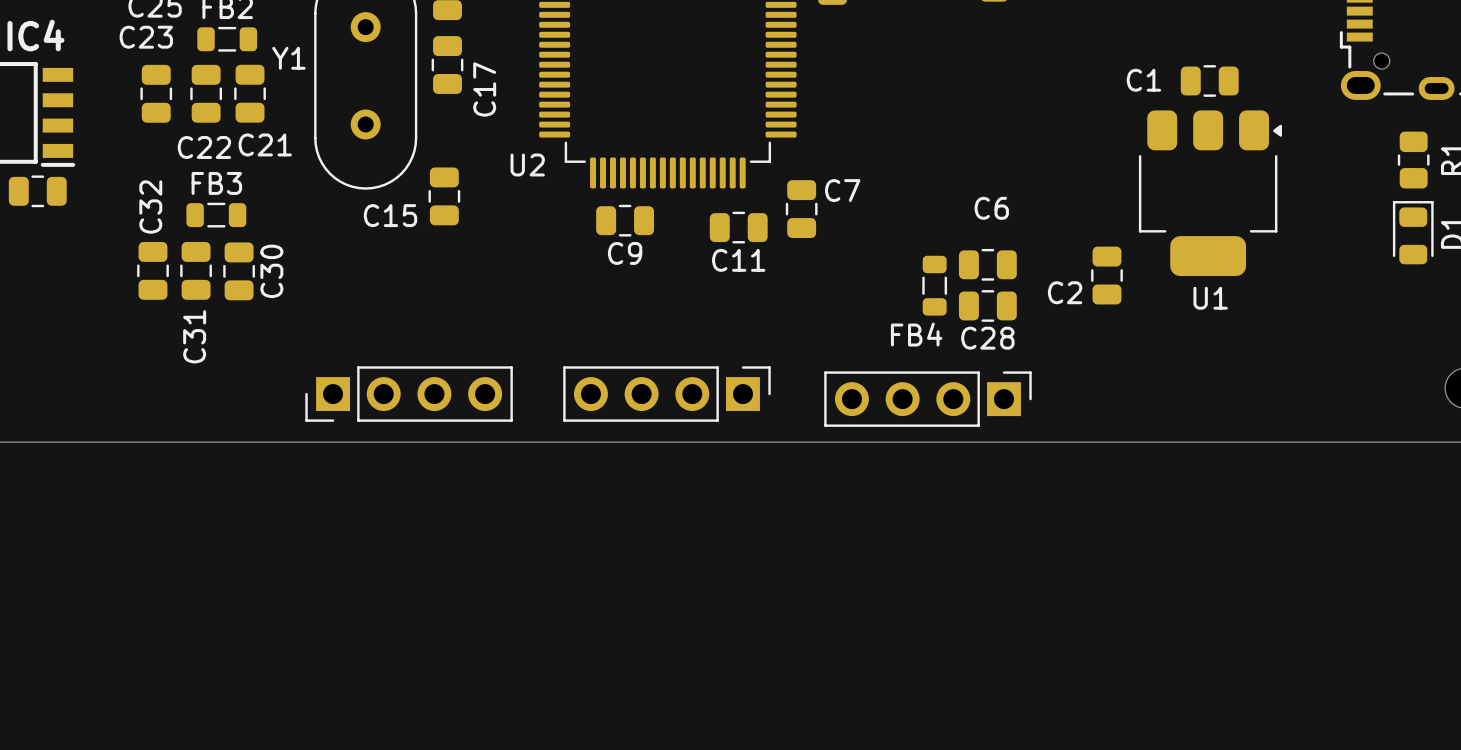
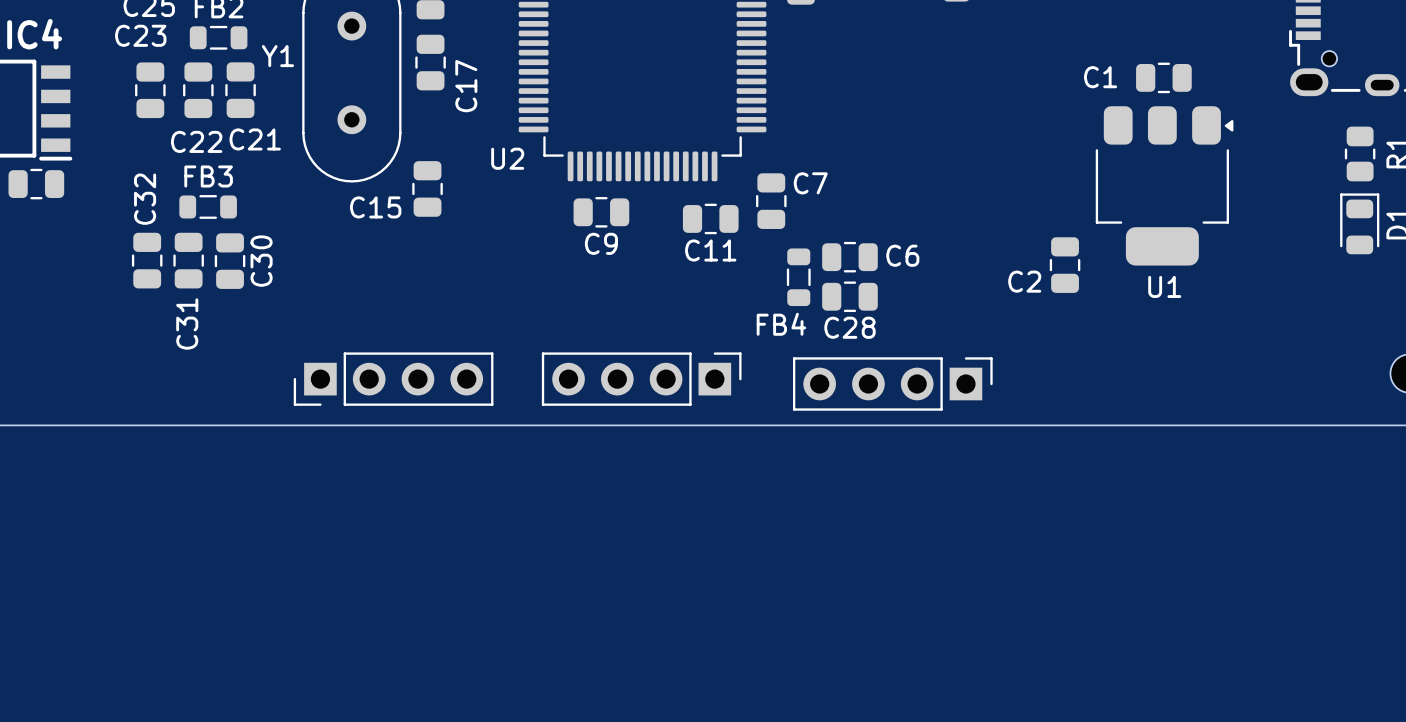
C6 name position: C6 (991, 208) -> C6 (902, 255)
C6 position: (987, 264) -> (849, 257)
FB4 position: (934, 285) -> (798, 277)
C28 position: (987, 305) -> (849, 296)

